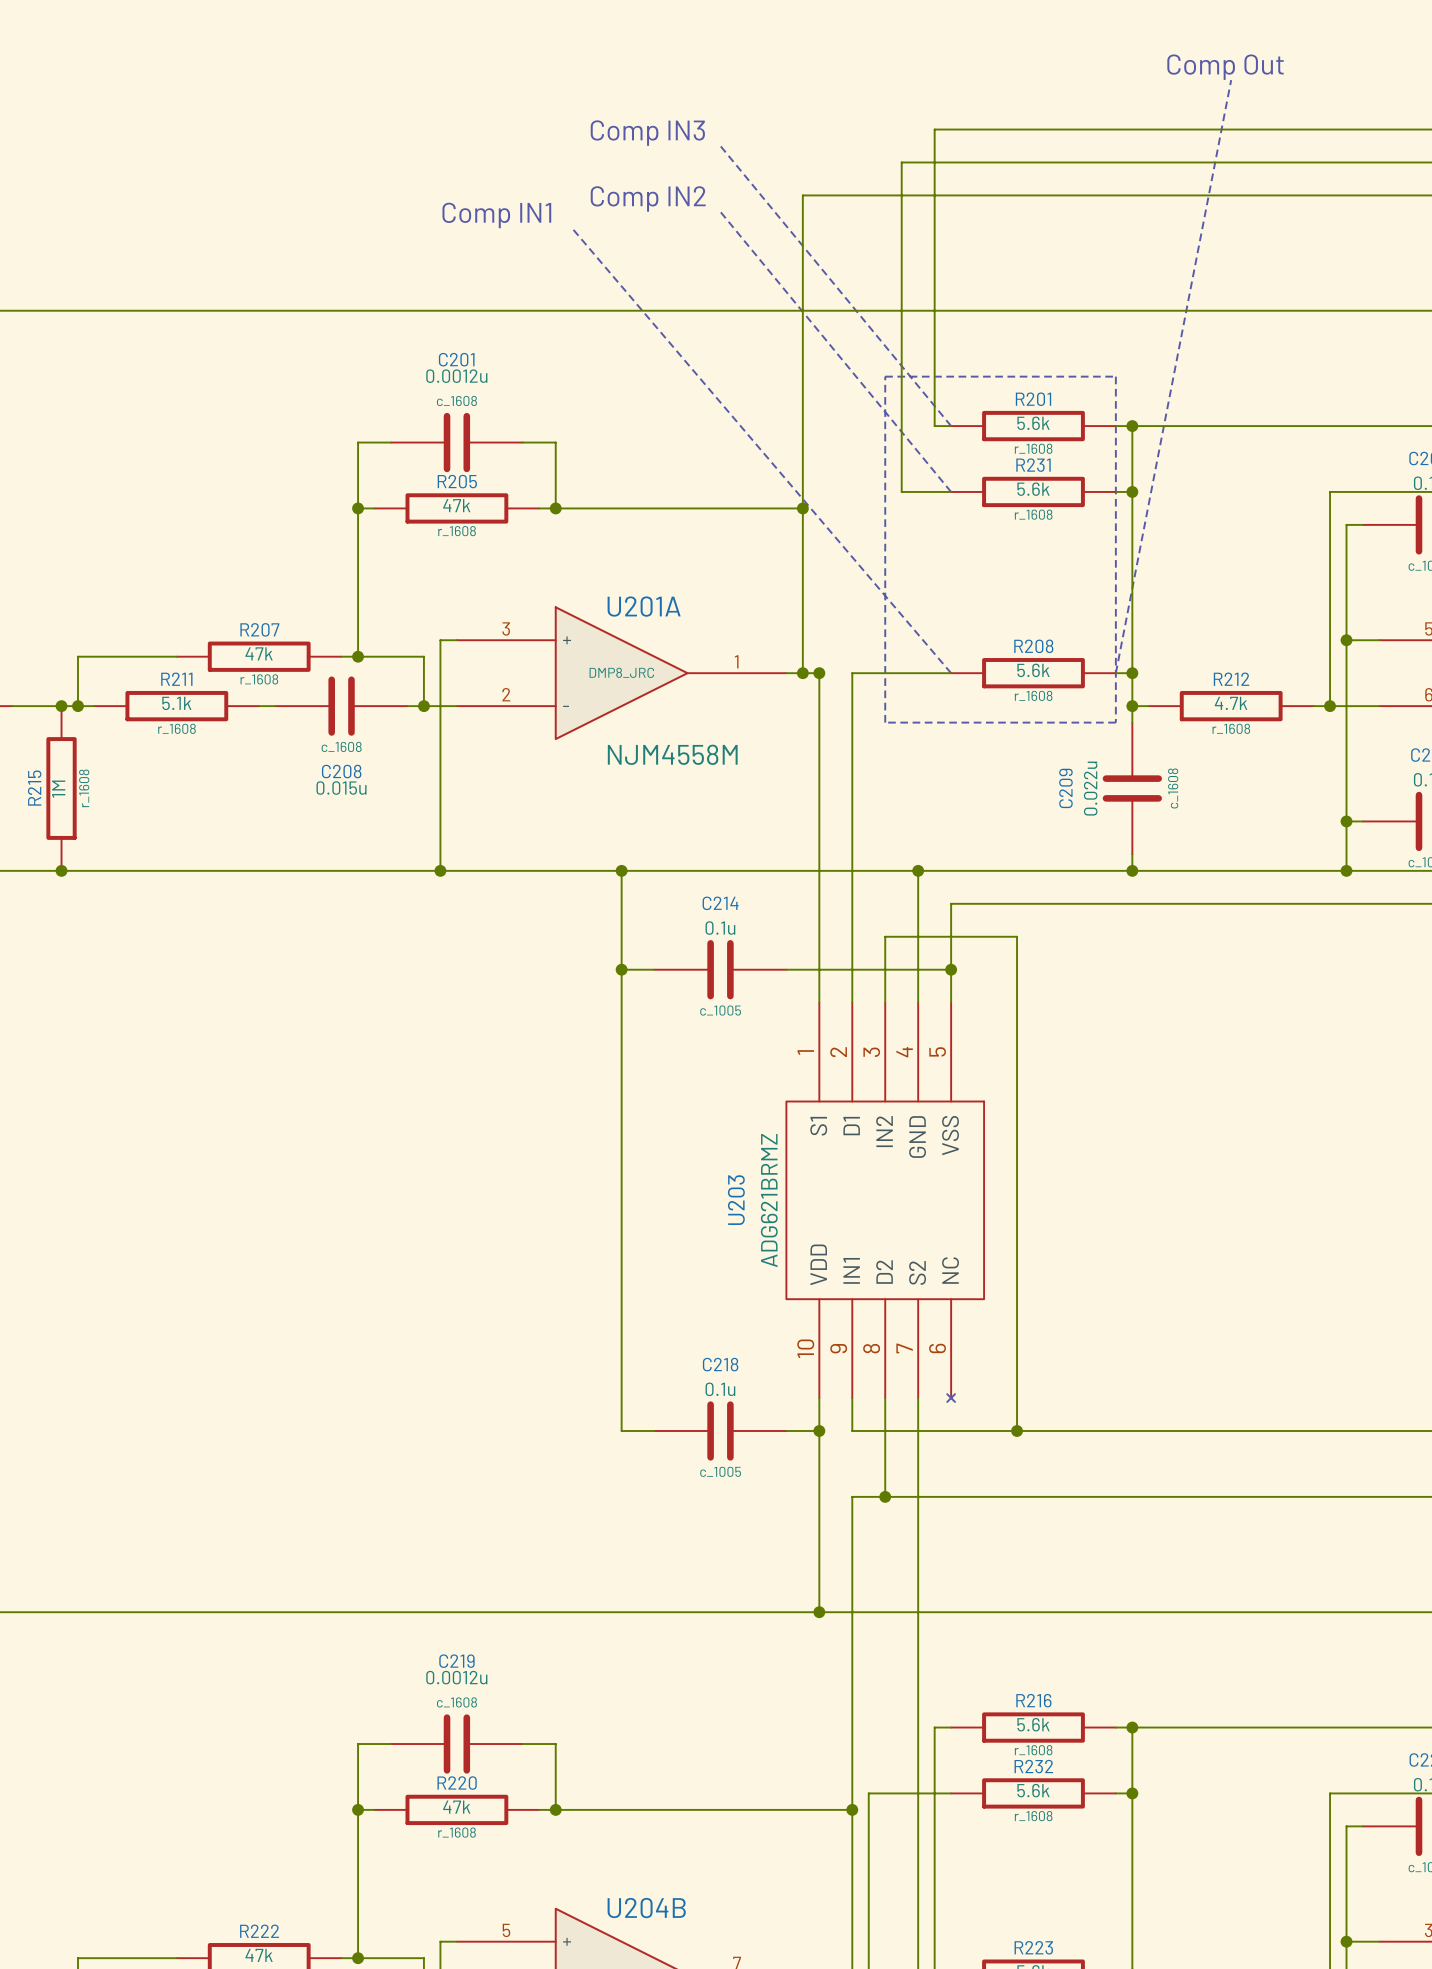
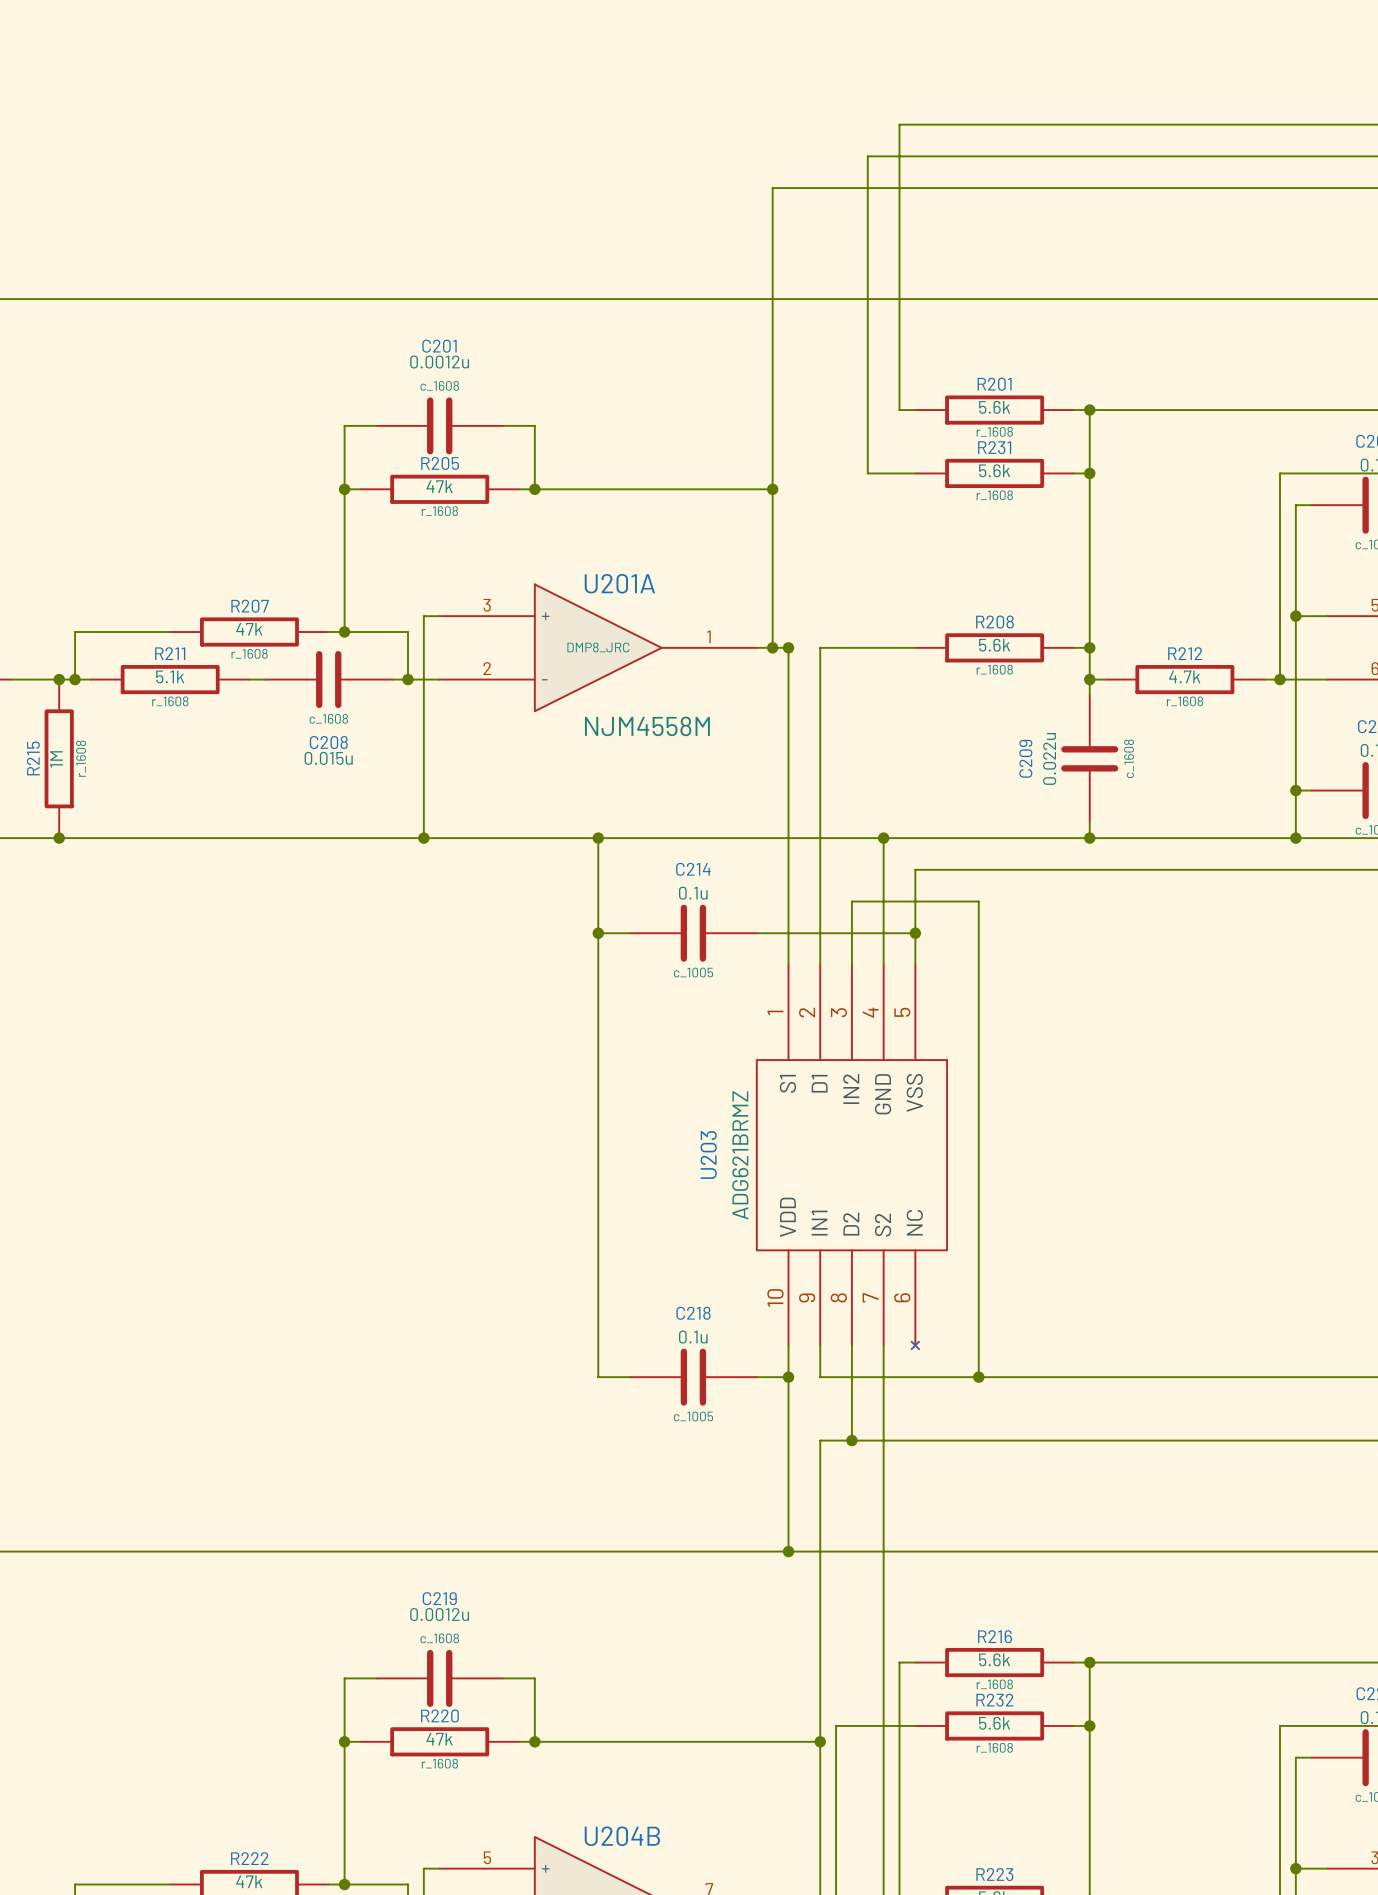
text: Comp Out (1225, 67) -> none
line: (1231, 80) (1115, 673) -> none
text: Comp IN3 (647, 133) -> none
line: (720, 146) (951, 426) -> none
text: Comp IN2 (648, 198) -> none
line: (720, 211) (951, 491) -> none
text: Comp IN1 (496, 215) -> none
line: (572, 228) (951, 673) -> none
line: (885, 376) (1115, 376) (1115, 722) (885, 722) (885, 376) -> none

